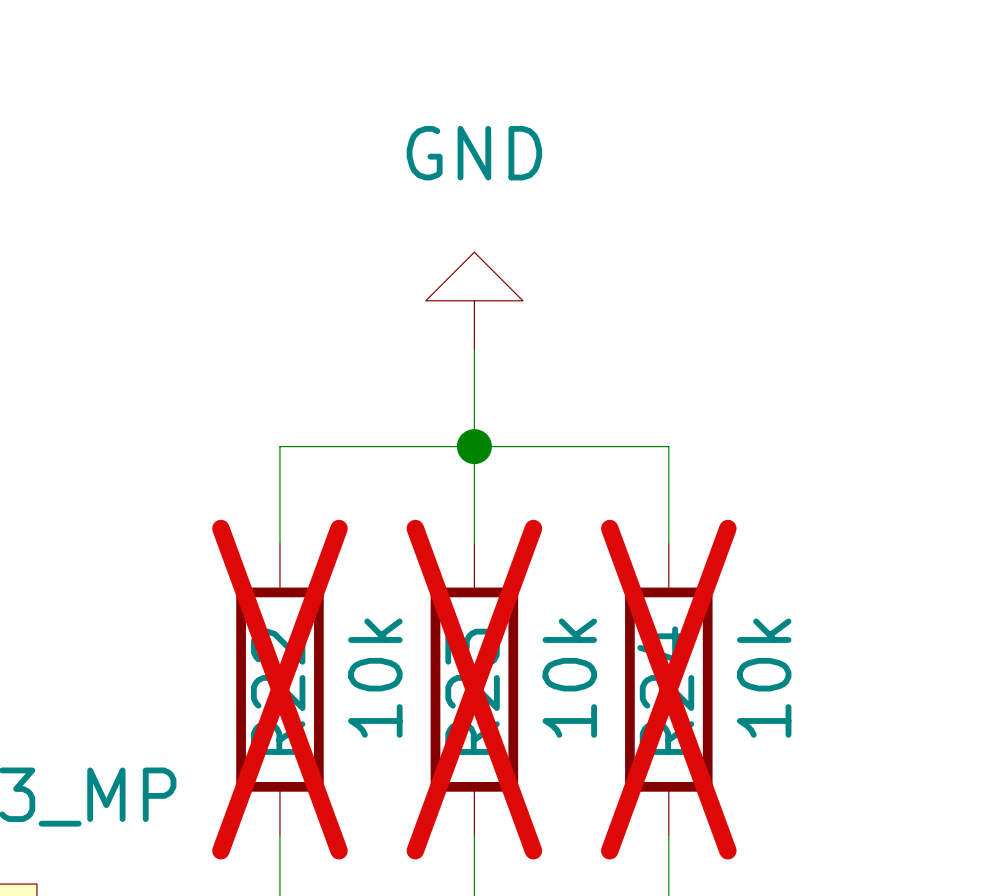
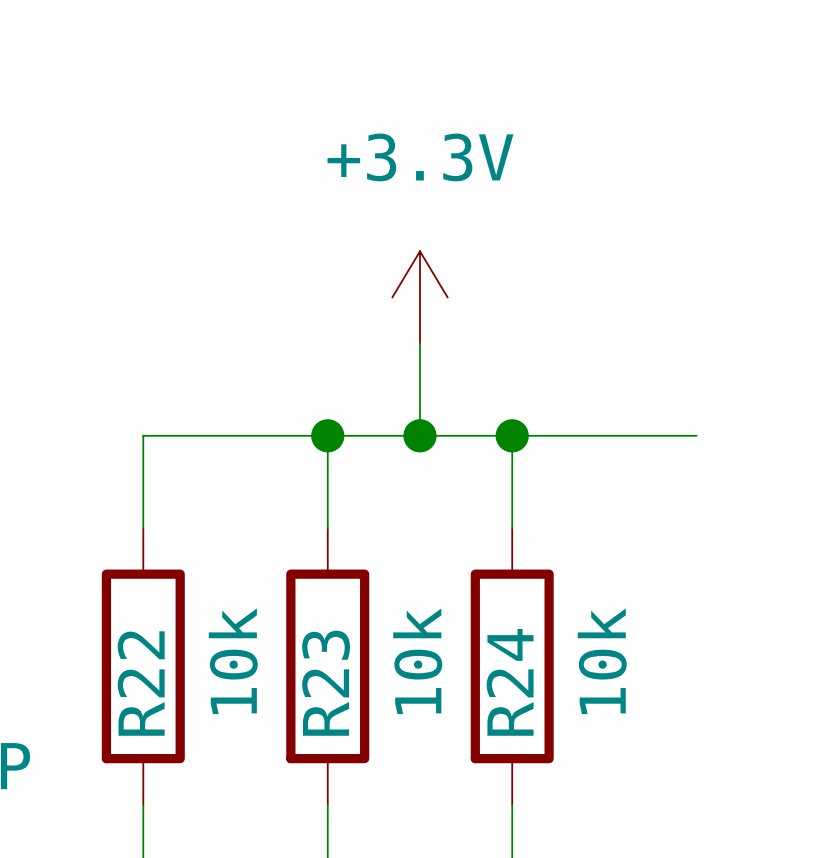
power symbol: GND (474, 300) -> none
power symbol: none -> +3.3V (419, 297)
wire: (474, 349) (474, 446) -> (419, 343) (419, 435)
junction: none -> (419, 435)
wire: none -> (512, 435) (696, 435)
junction: none -> (512, 435)
R22 do-not-place cross: (279, 689) -> none
R23 do-not-place cross: (474, 689) -> none
R24 do-not-place cross: (668, 689) -> none

